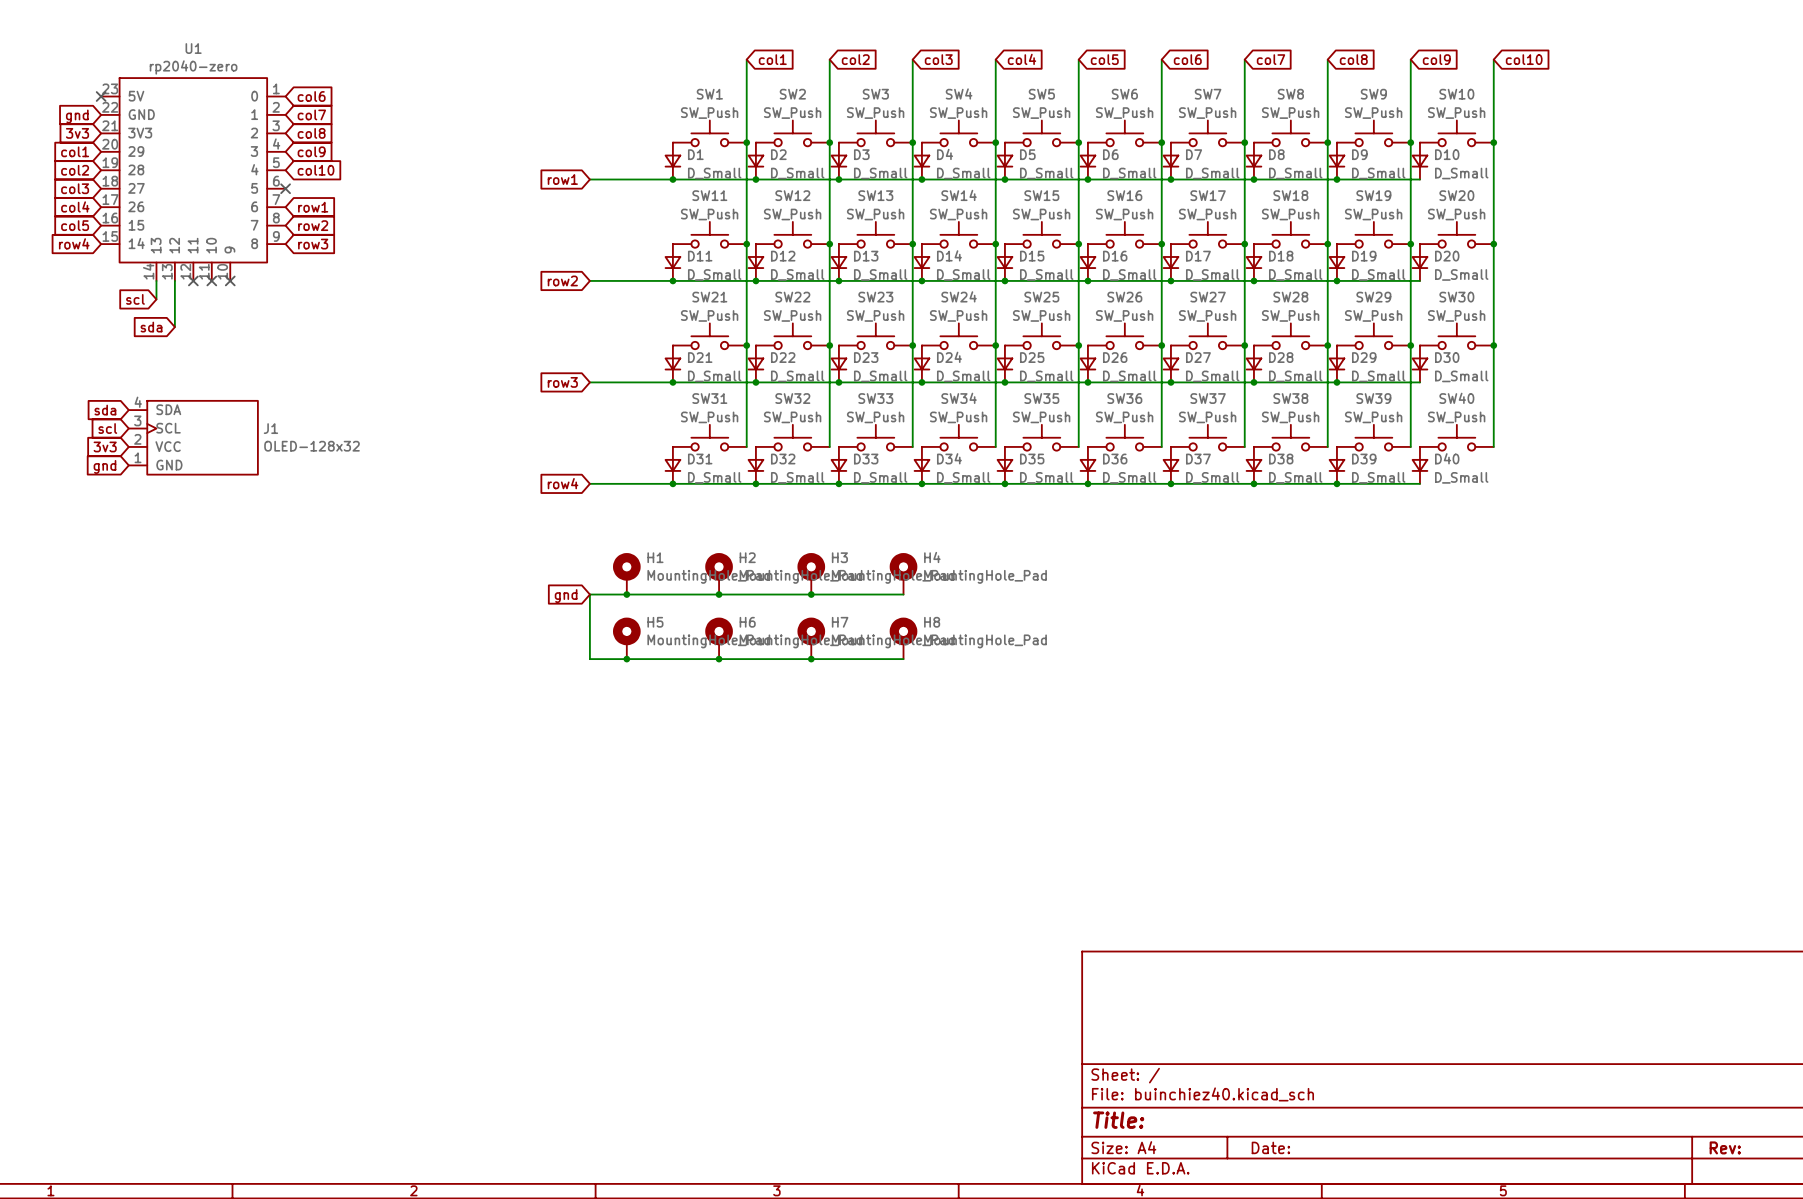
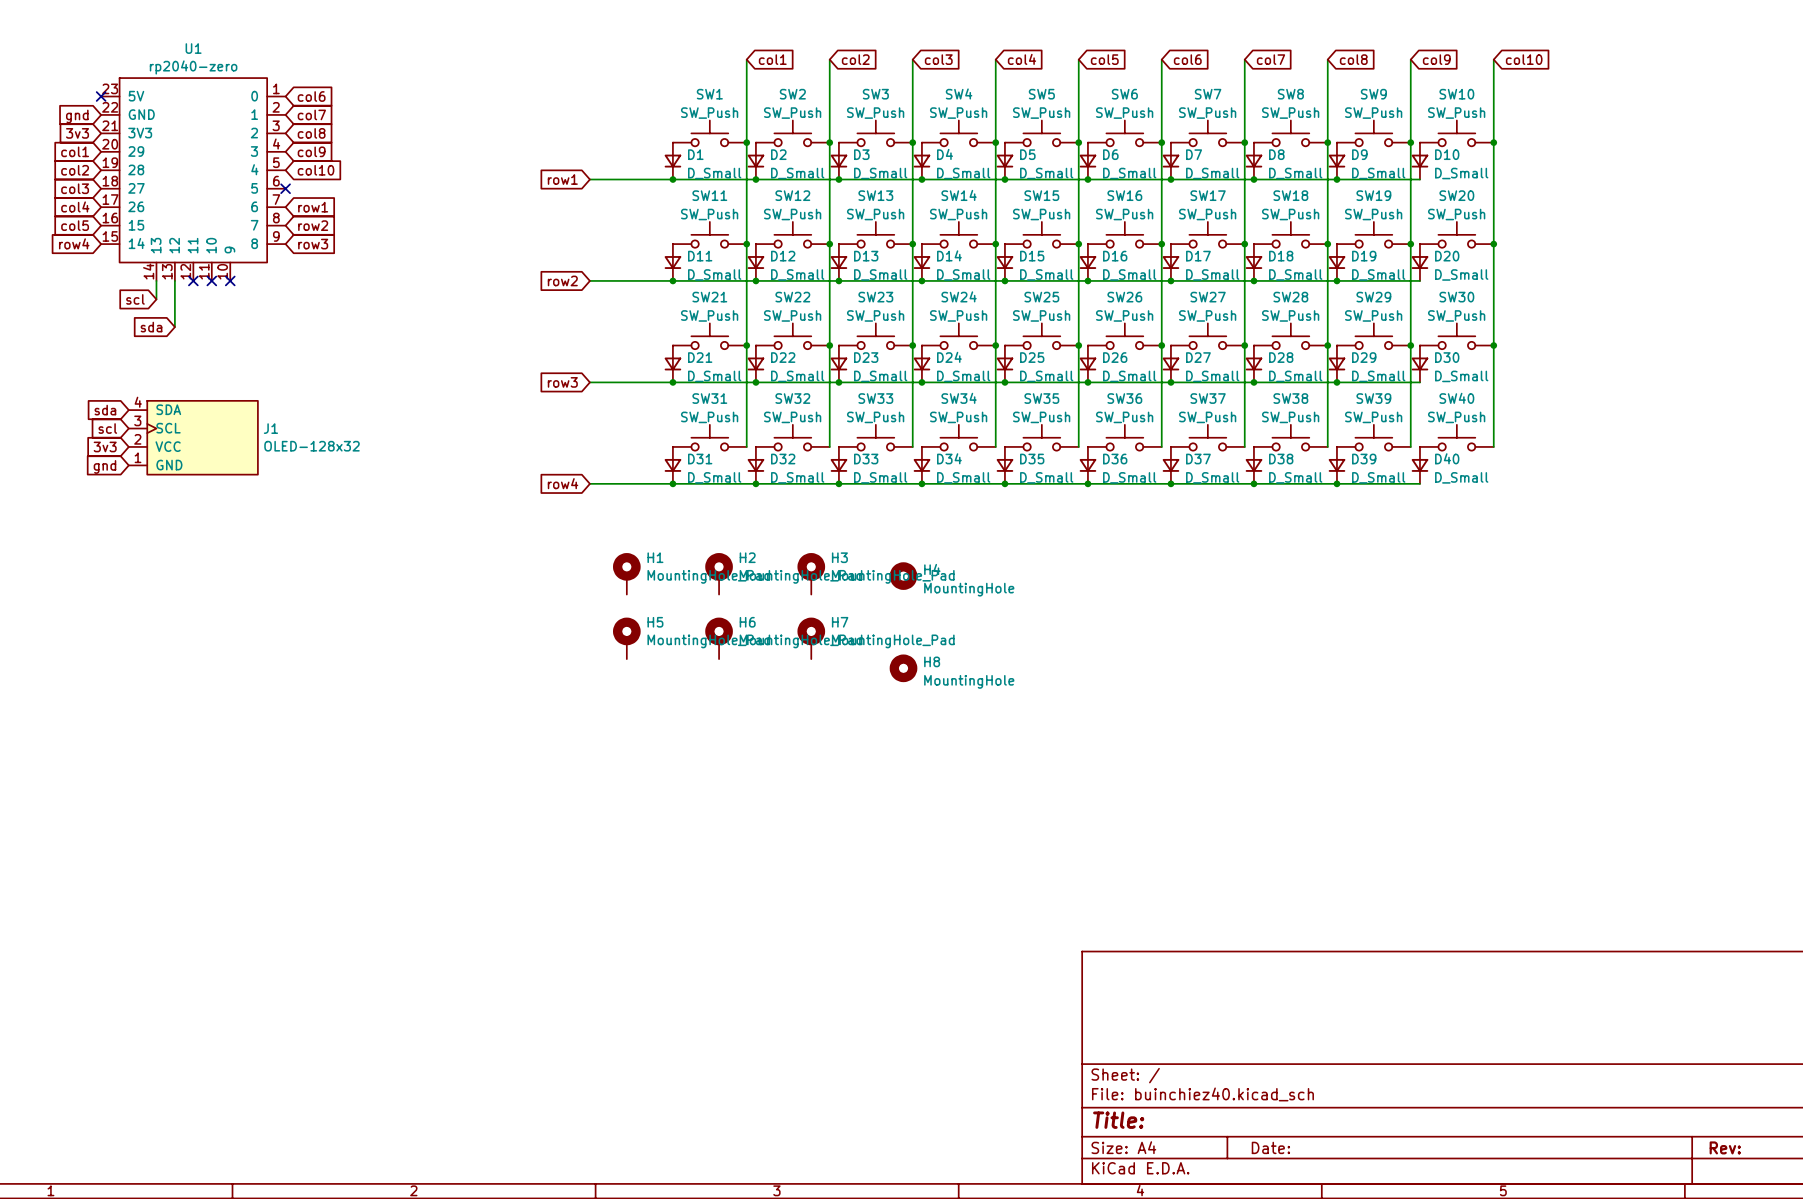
H4 symbol: [889, 553, 918, 595] -> [889, 562, 918, 590]
H4 value: MountingHole_Pad (985, 576) -> MountingHole (969, 589)
junction: (626, 594) -> none
junction: (719, 594) -> none
junction: (811, 594) -> none
wire: (903, 594) (589, 594) (589, 659) (903, 659) -> none
global label: gnd (566, 596) -> none
H8 symbol: [889, 617, 918, 660] -> [889, 654, 918, 683]
H8 value: MountingHole_Pad (985, 641) -> MountingHole (969, 681)
junction: (626, 659) -> none
junction: (719, 659) -> none
junction: (811, 659) -> none

